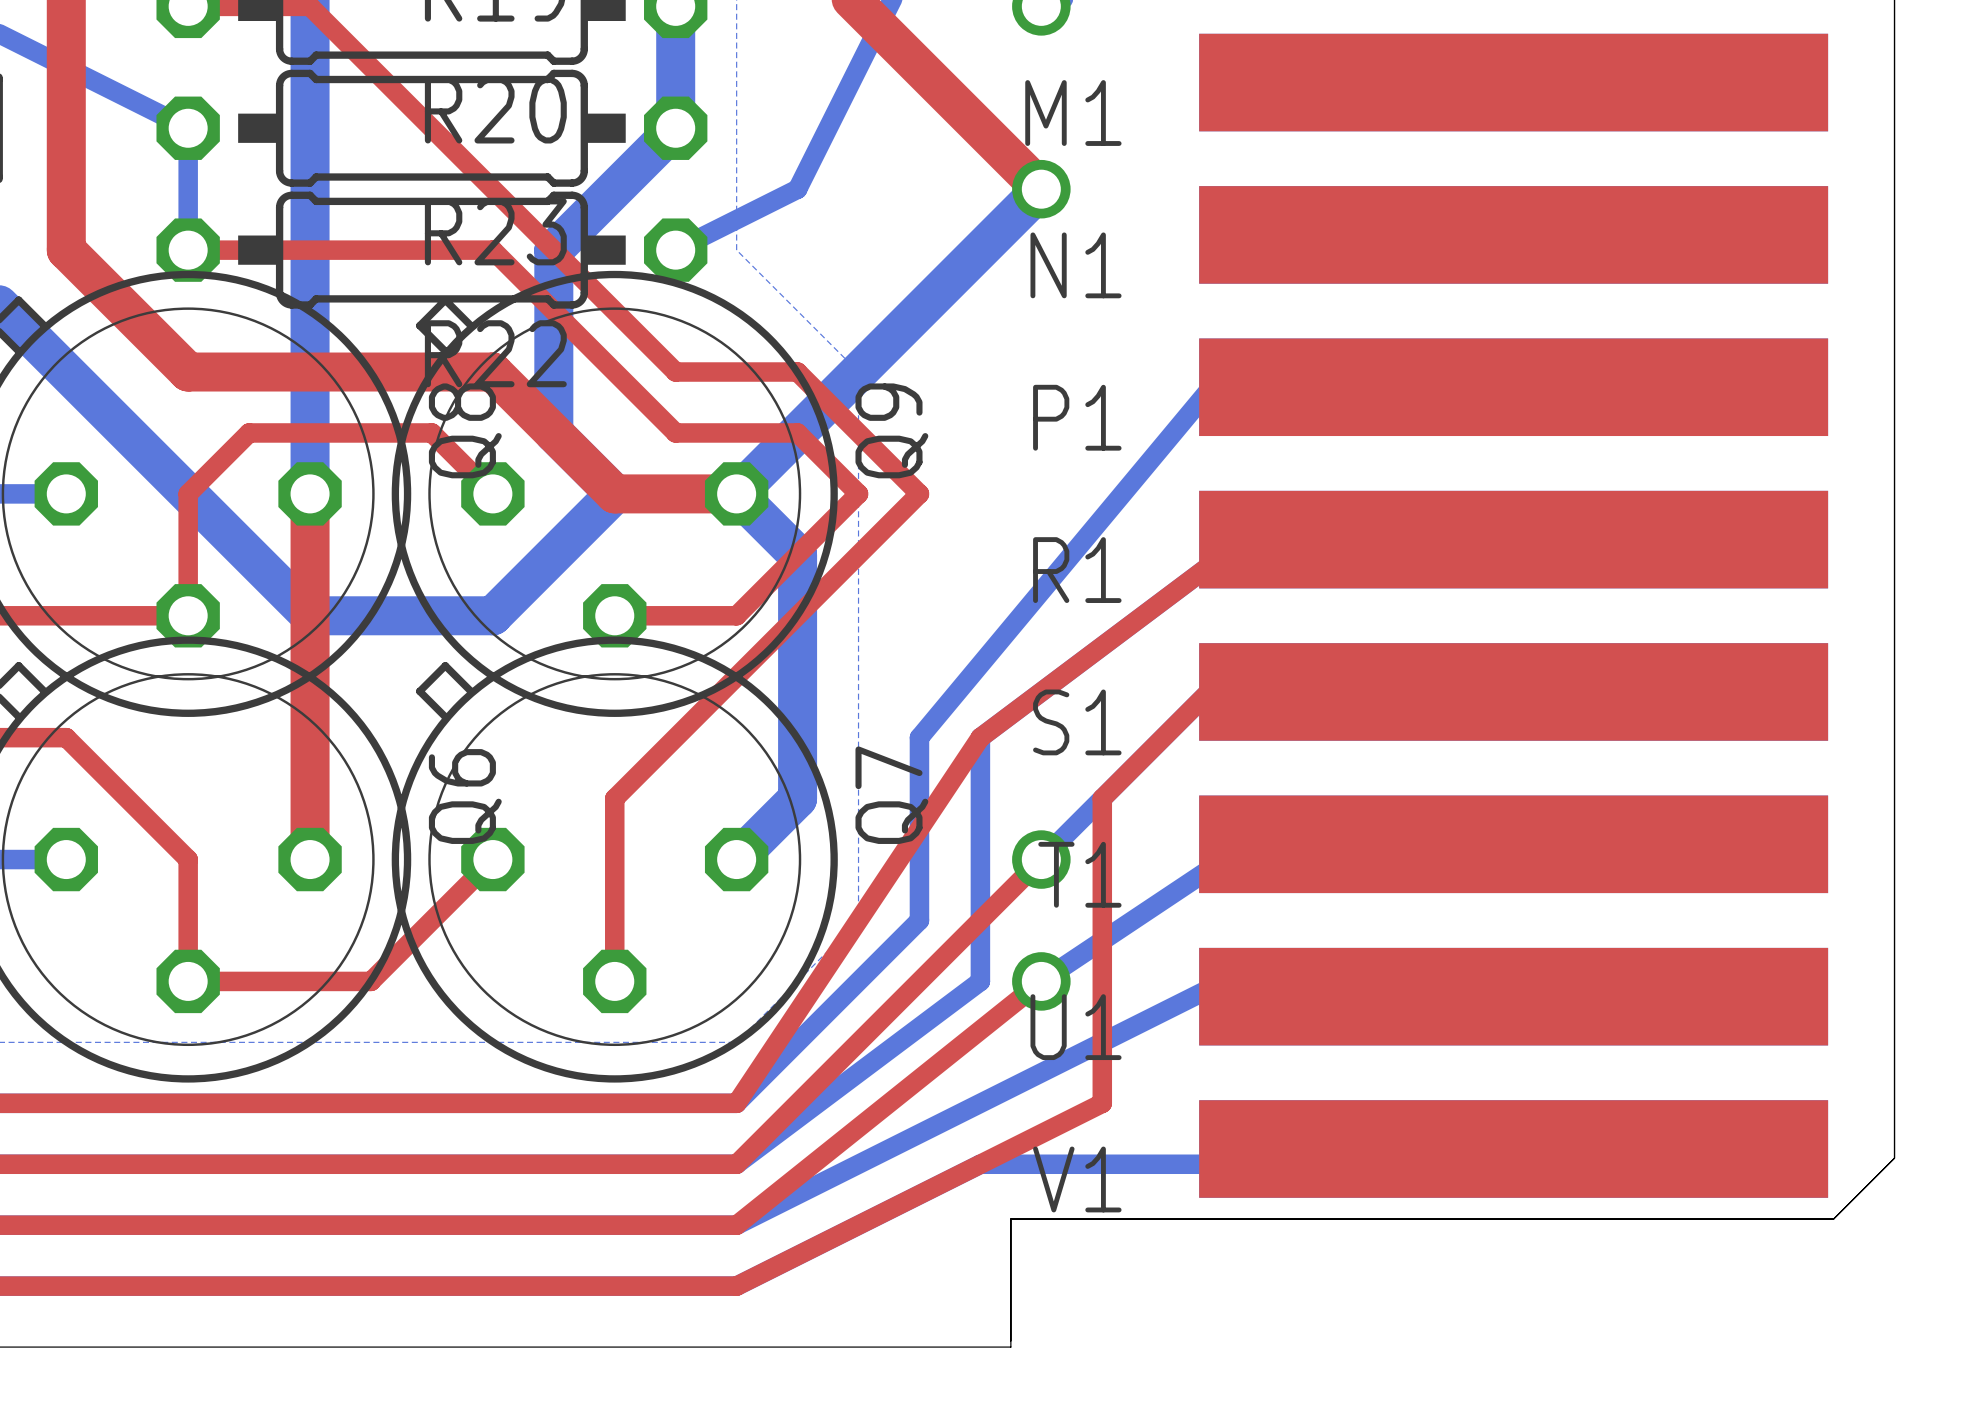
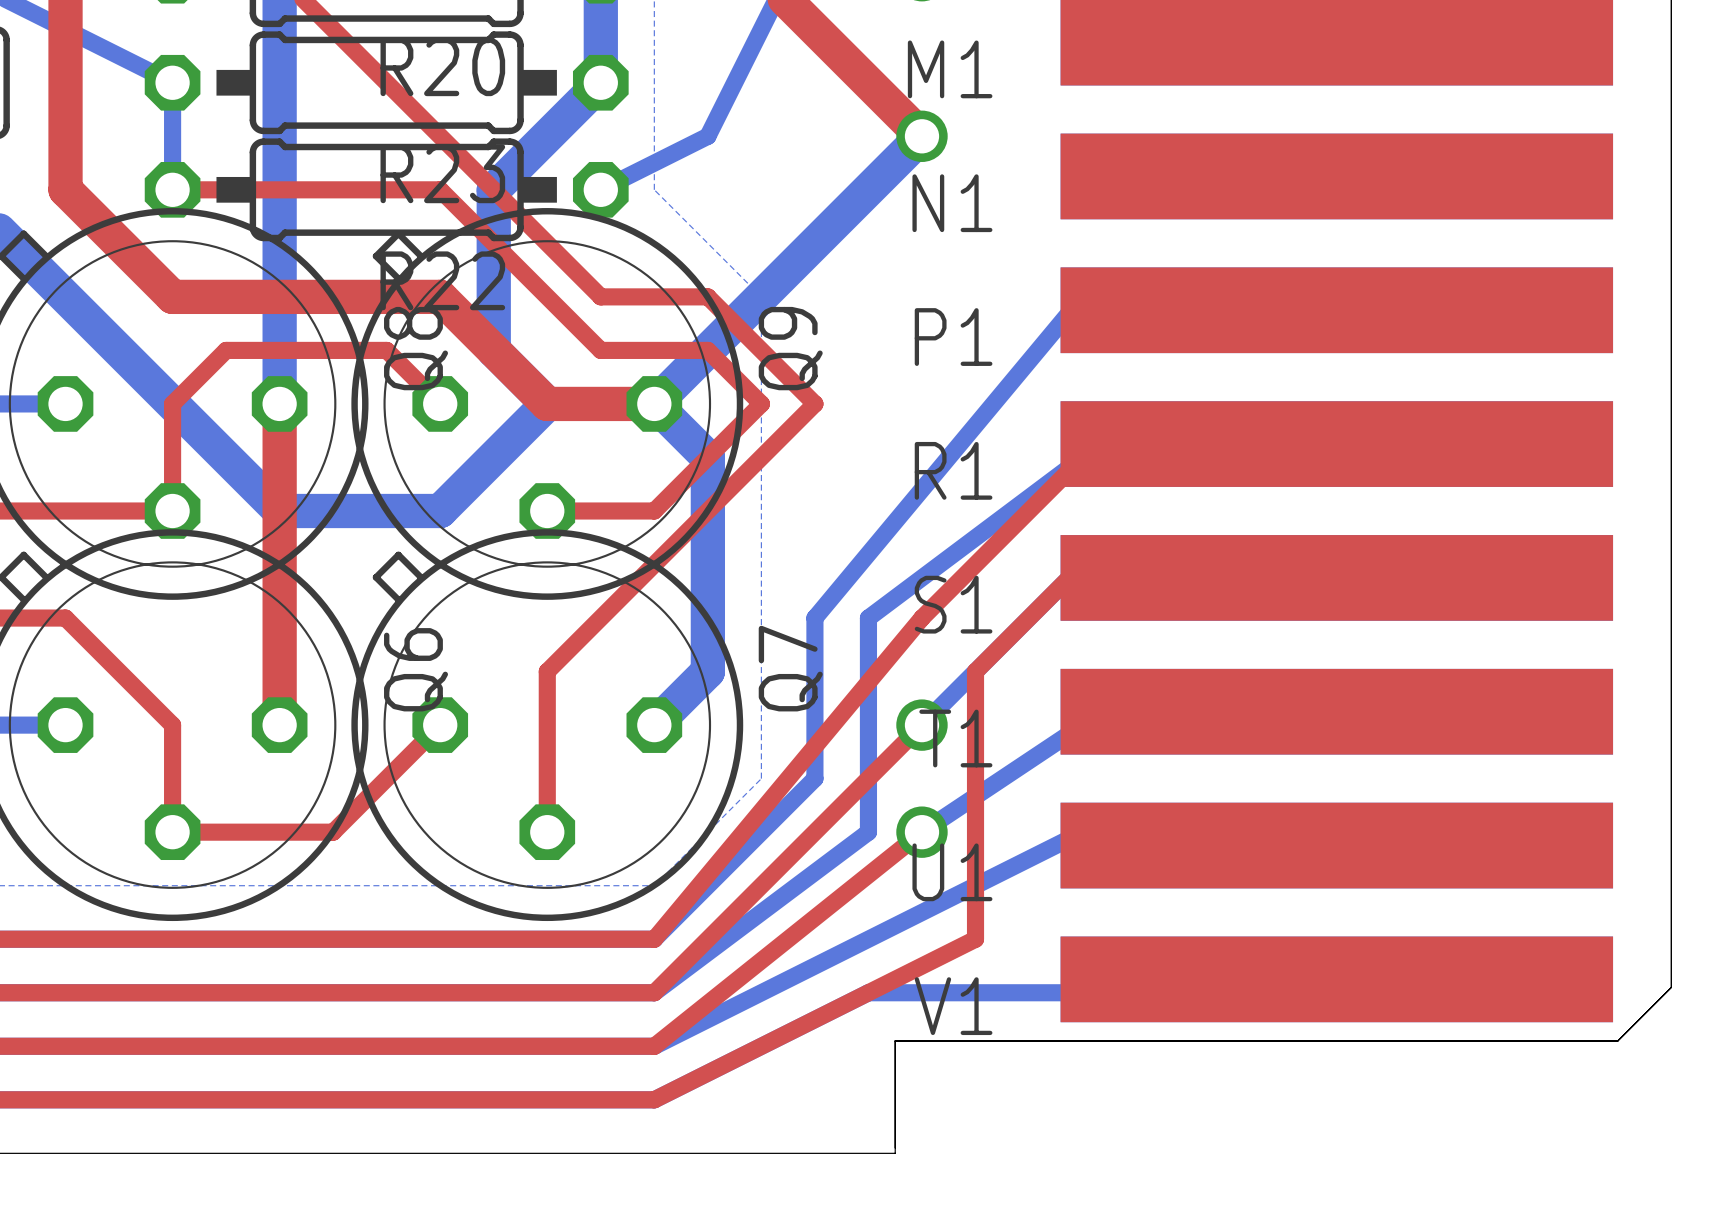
top track: (1224, 554) (980, 737) (736, 1103) -> (1082, 457) (921, 618) (654, 939)

